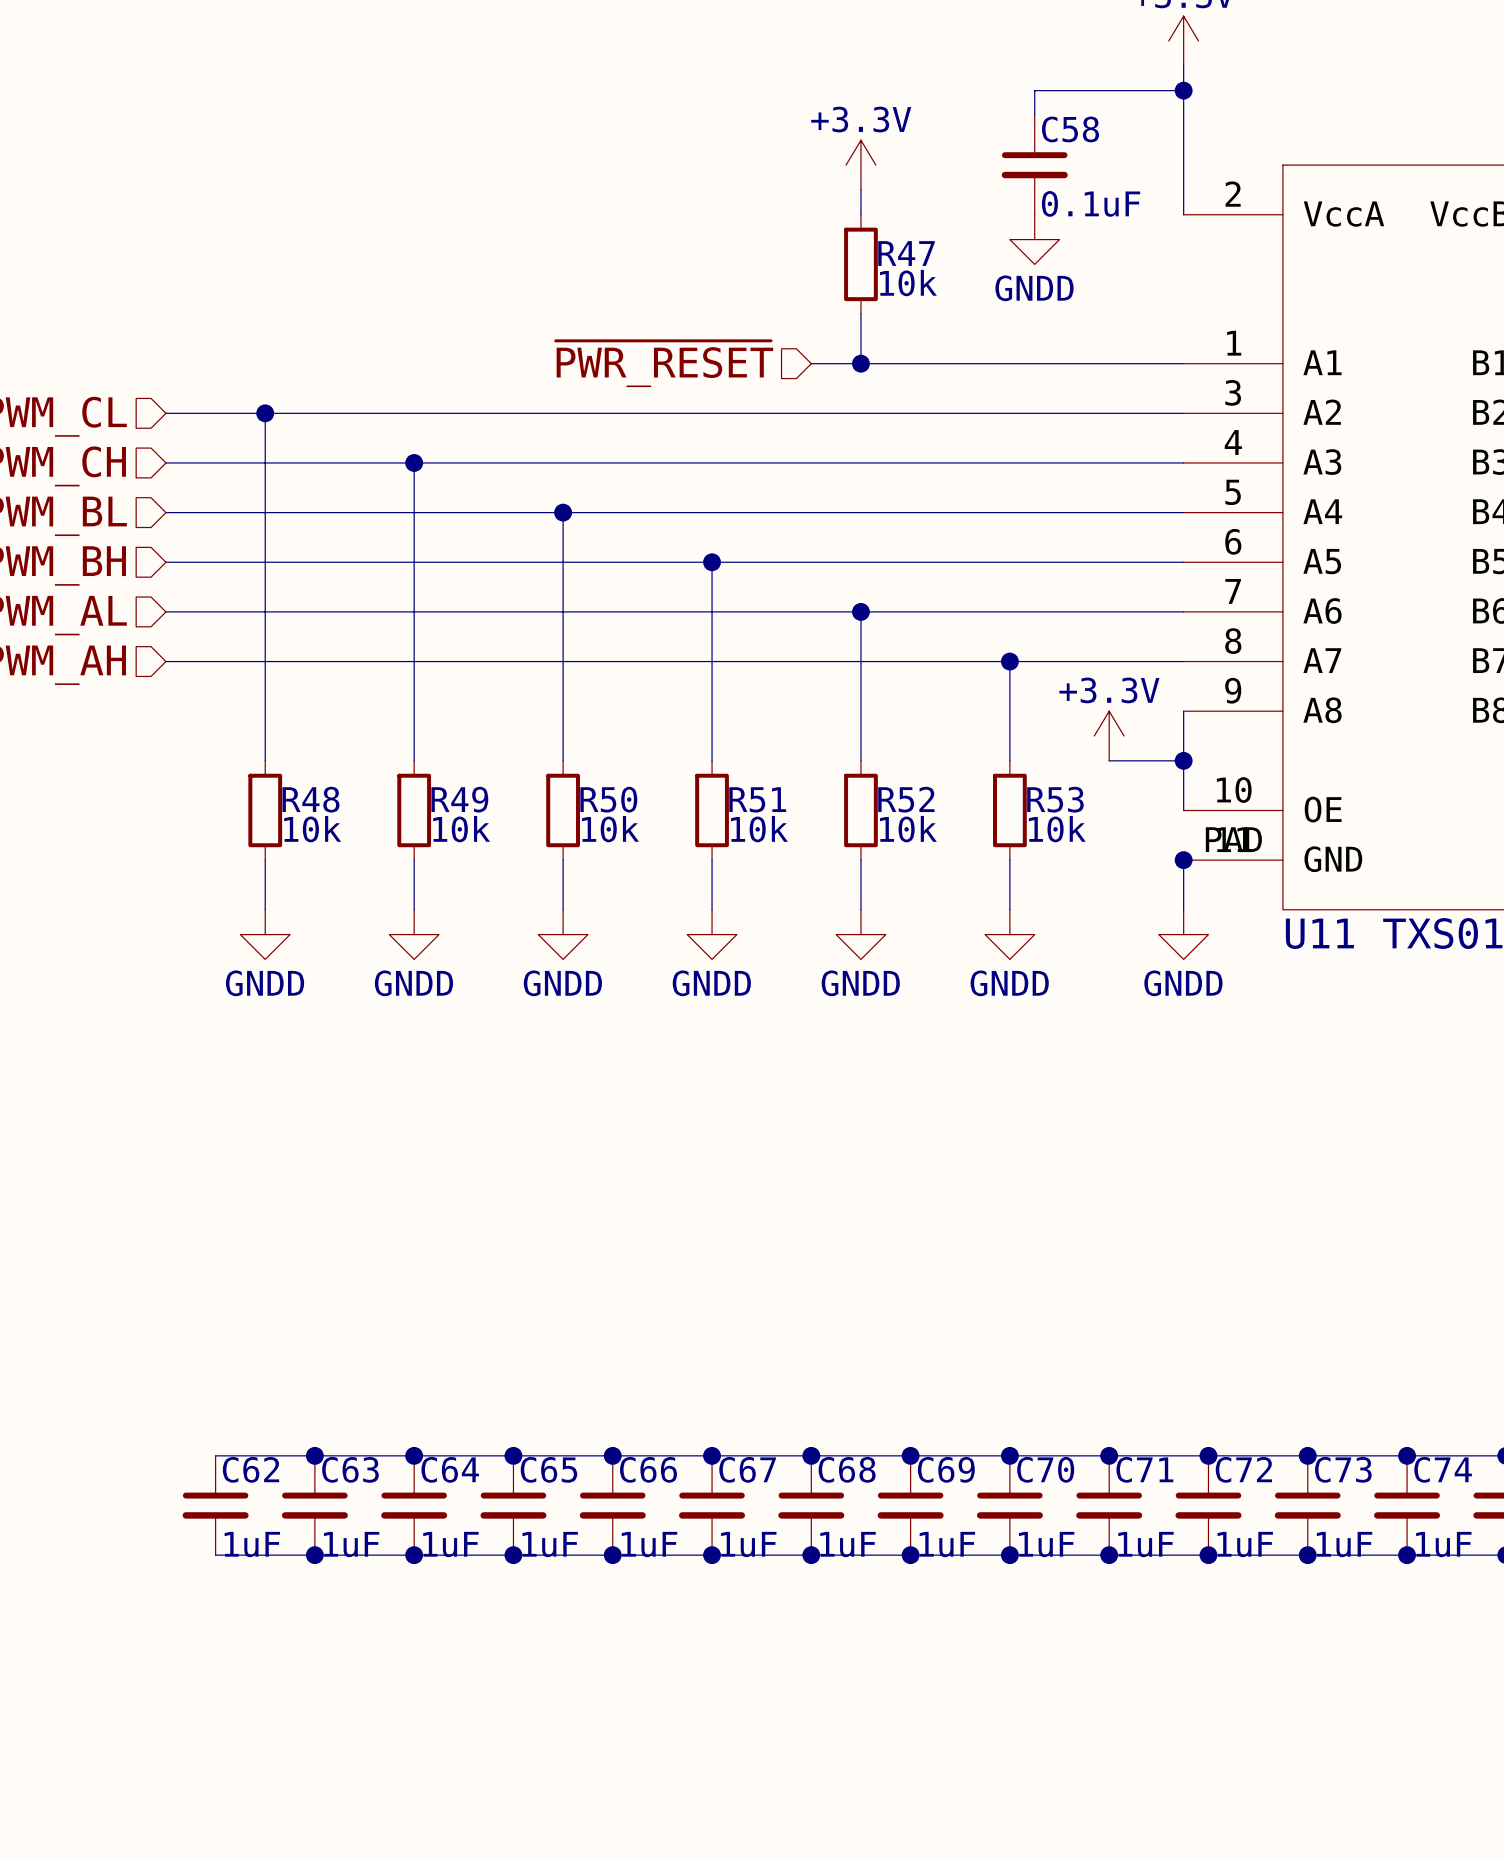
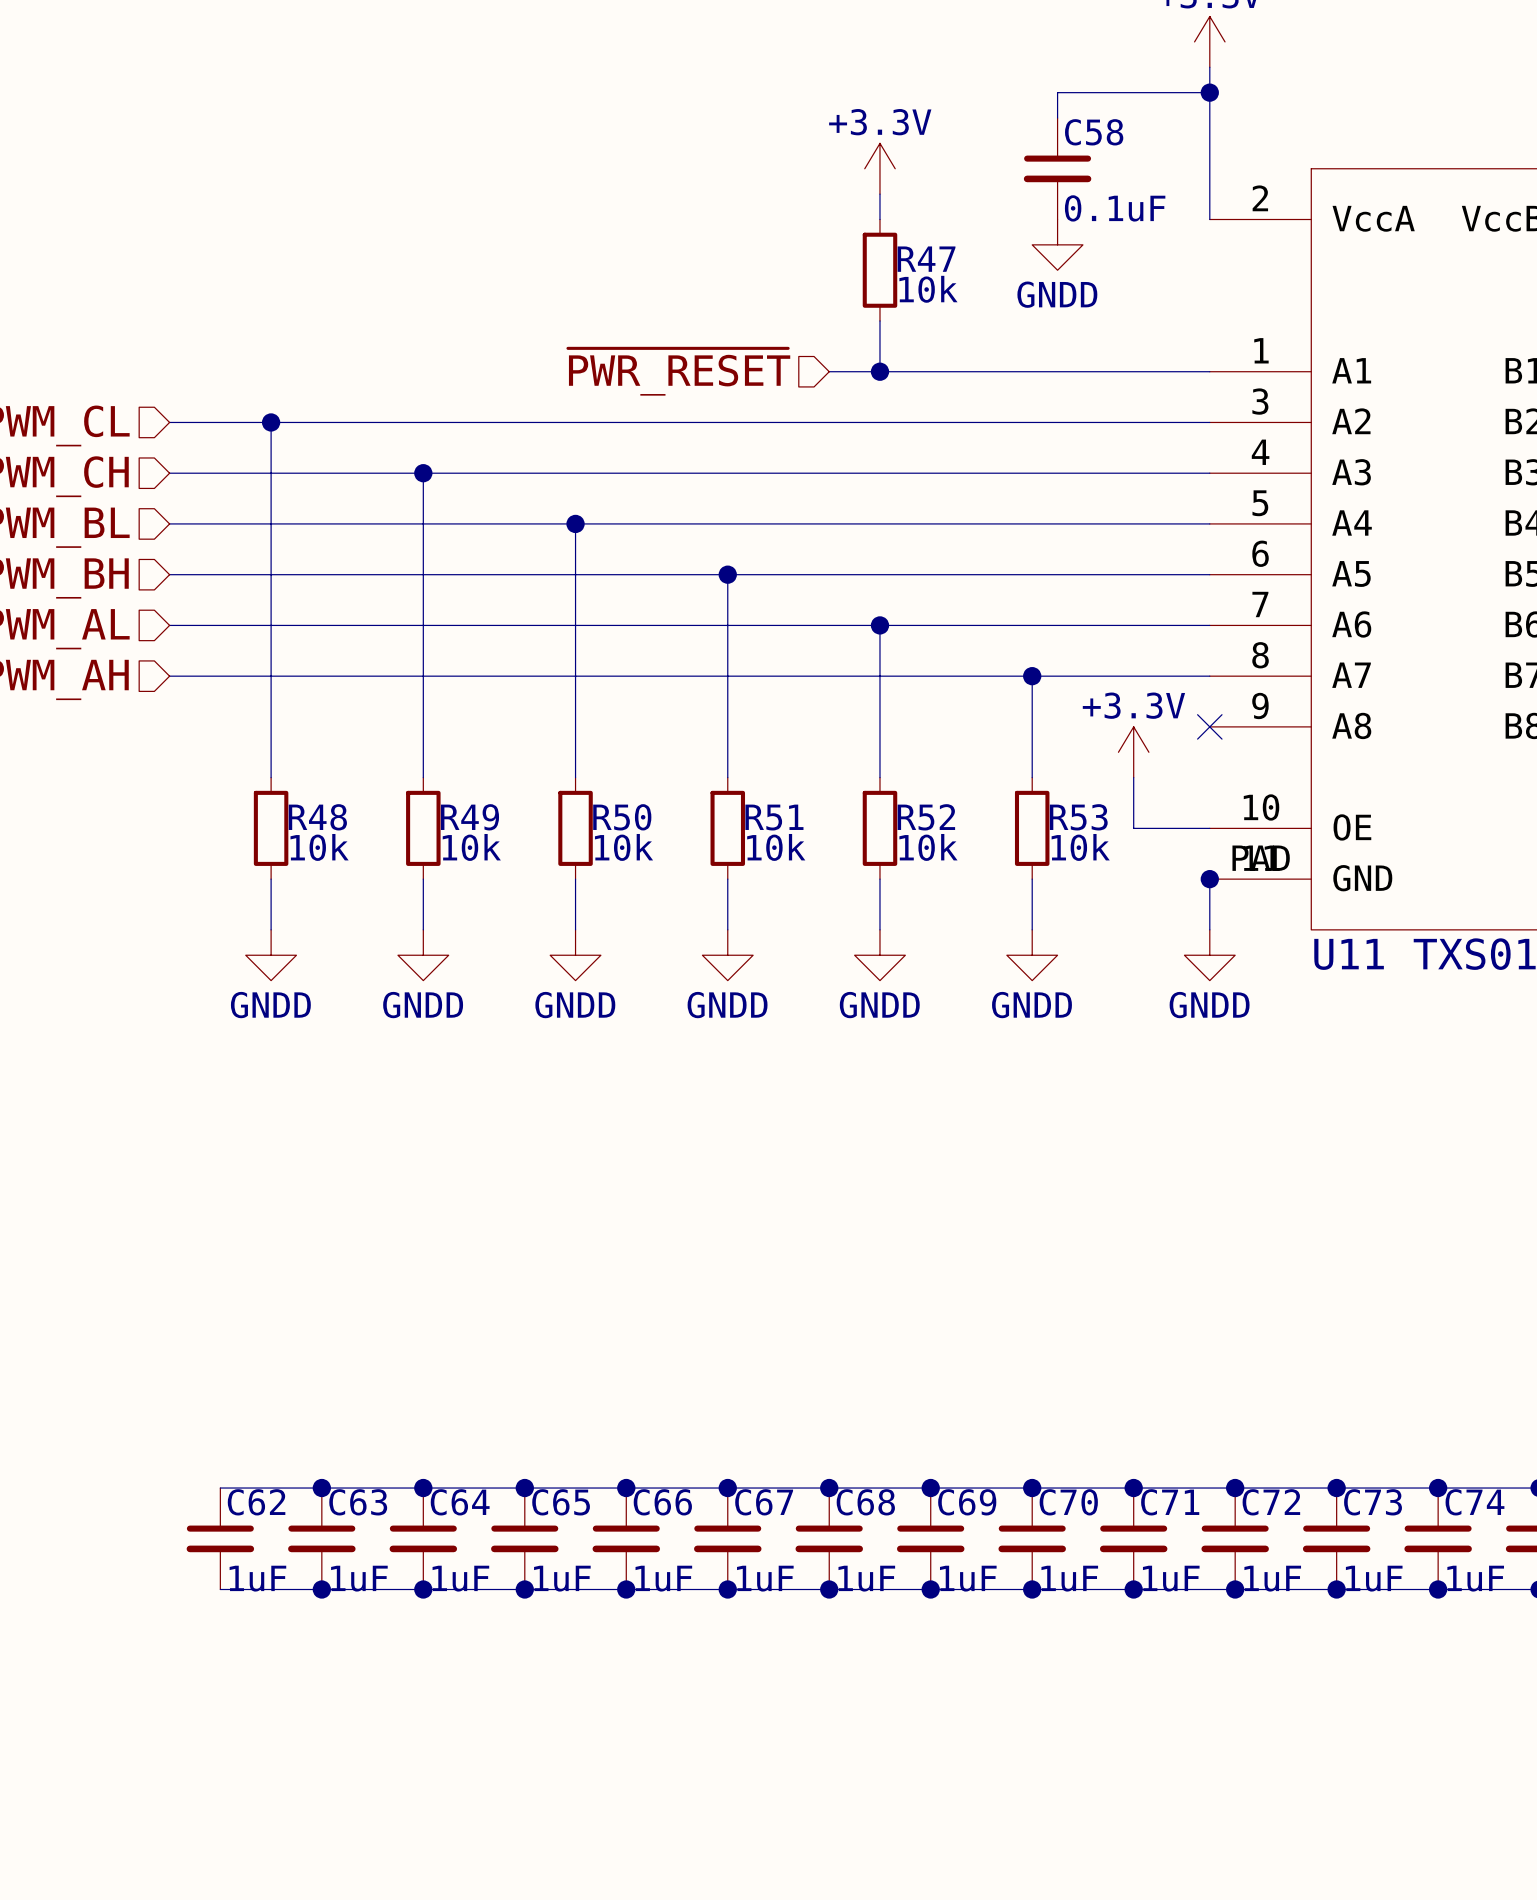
wire: (1183, 711) (1183, 810) -> none
no-connect mark: none -> (1209, 726)
wire: (1109, 760) (1183, 760) -> (1133, 777) (1133, 828) (1209, 828)
junction: (1183, 760) -> none

